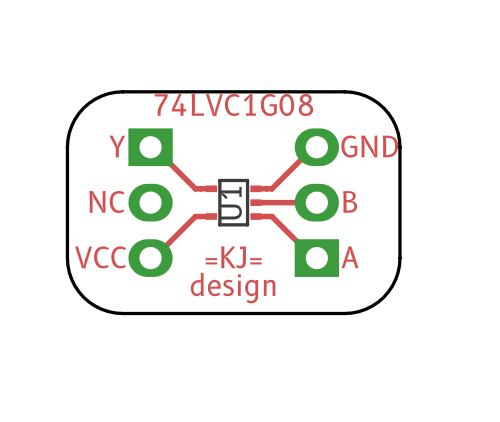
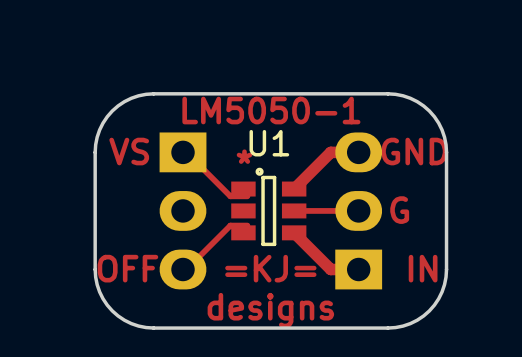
text: 74LVC1G08 (233, 105) -> LM5050-1 (271, 110)
text: none -> VS (129, 151)
text: Y (117, 146) -> none
top track: (313, 147) (271, 188) (255, 188) -> (355, 152) (330, 152) (294, 189)
text: none -> * (244, 156)
U1 footprint: [205, 178, 262, 227] -> [231, 167, 307, 247]
text: NC (106, 201) -> none
text: B (350, 201) -> G (399, 210)
U1 name rotation: 0° (230, 203) -> 90° clockwise (269, 143)
U1 name position: U1 (230, 203) -> U1 (269, 143)
top track: (255, 216) (271, 216) (313, 258) -> (294, 232) (330, 269) (355, 269)
text: VCC (100, 257) -> OFF (127, 268)
text: A (350, 257) -> none
text: none -> IN (423, 268)
text: design (233, 287) -> designs (270, 310)

